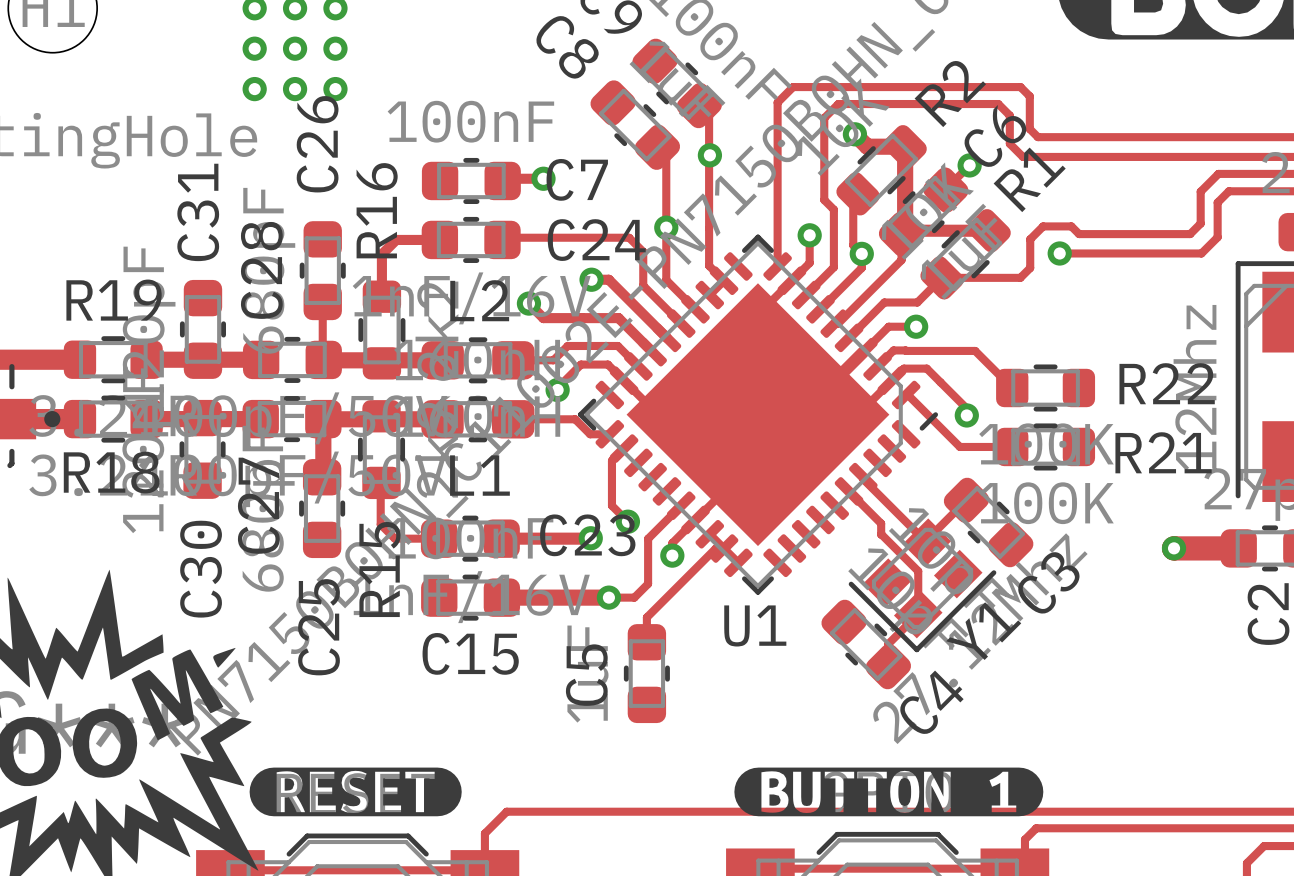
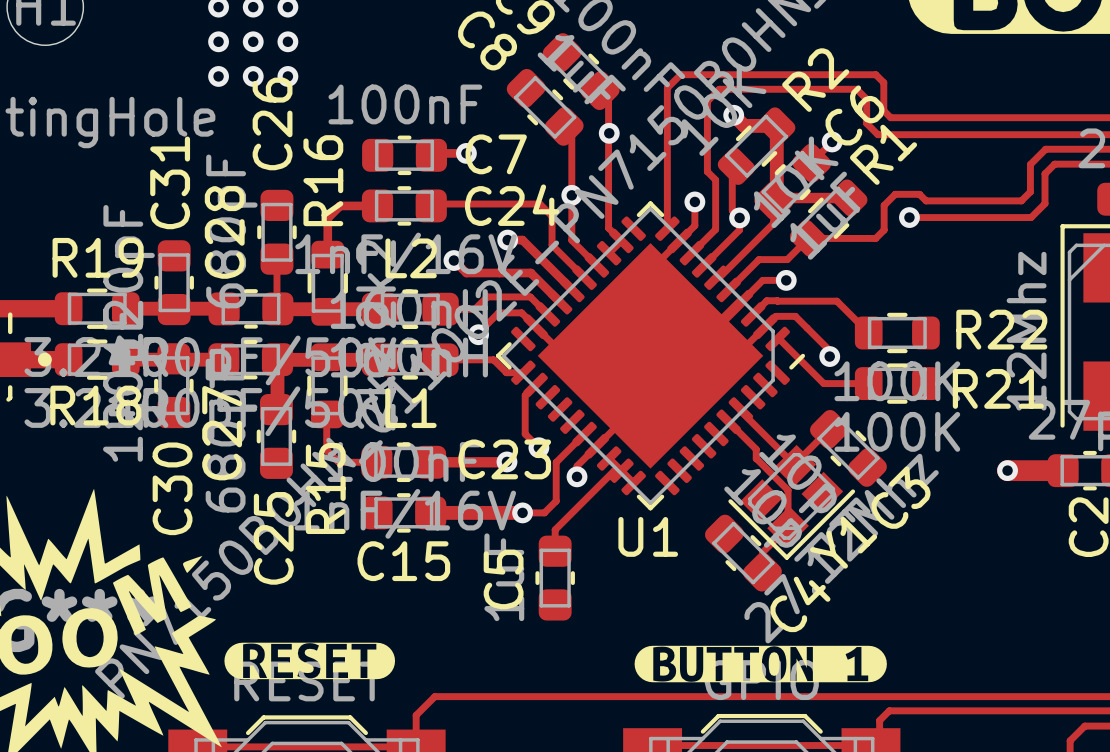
drawing shape: [249, 767, 462, 817] -> [224, 642, 396, 680]
drawing shape: [734, 767, 1044, 817] -> [634, 645, 887, 683]

